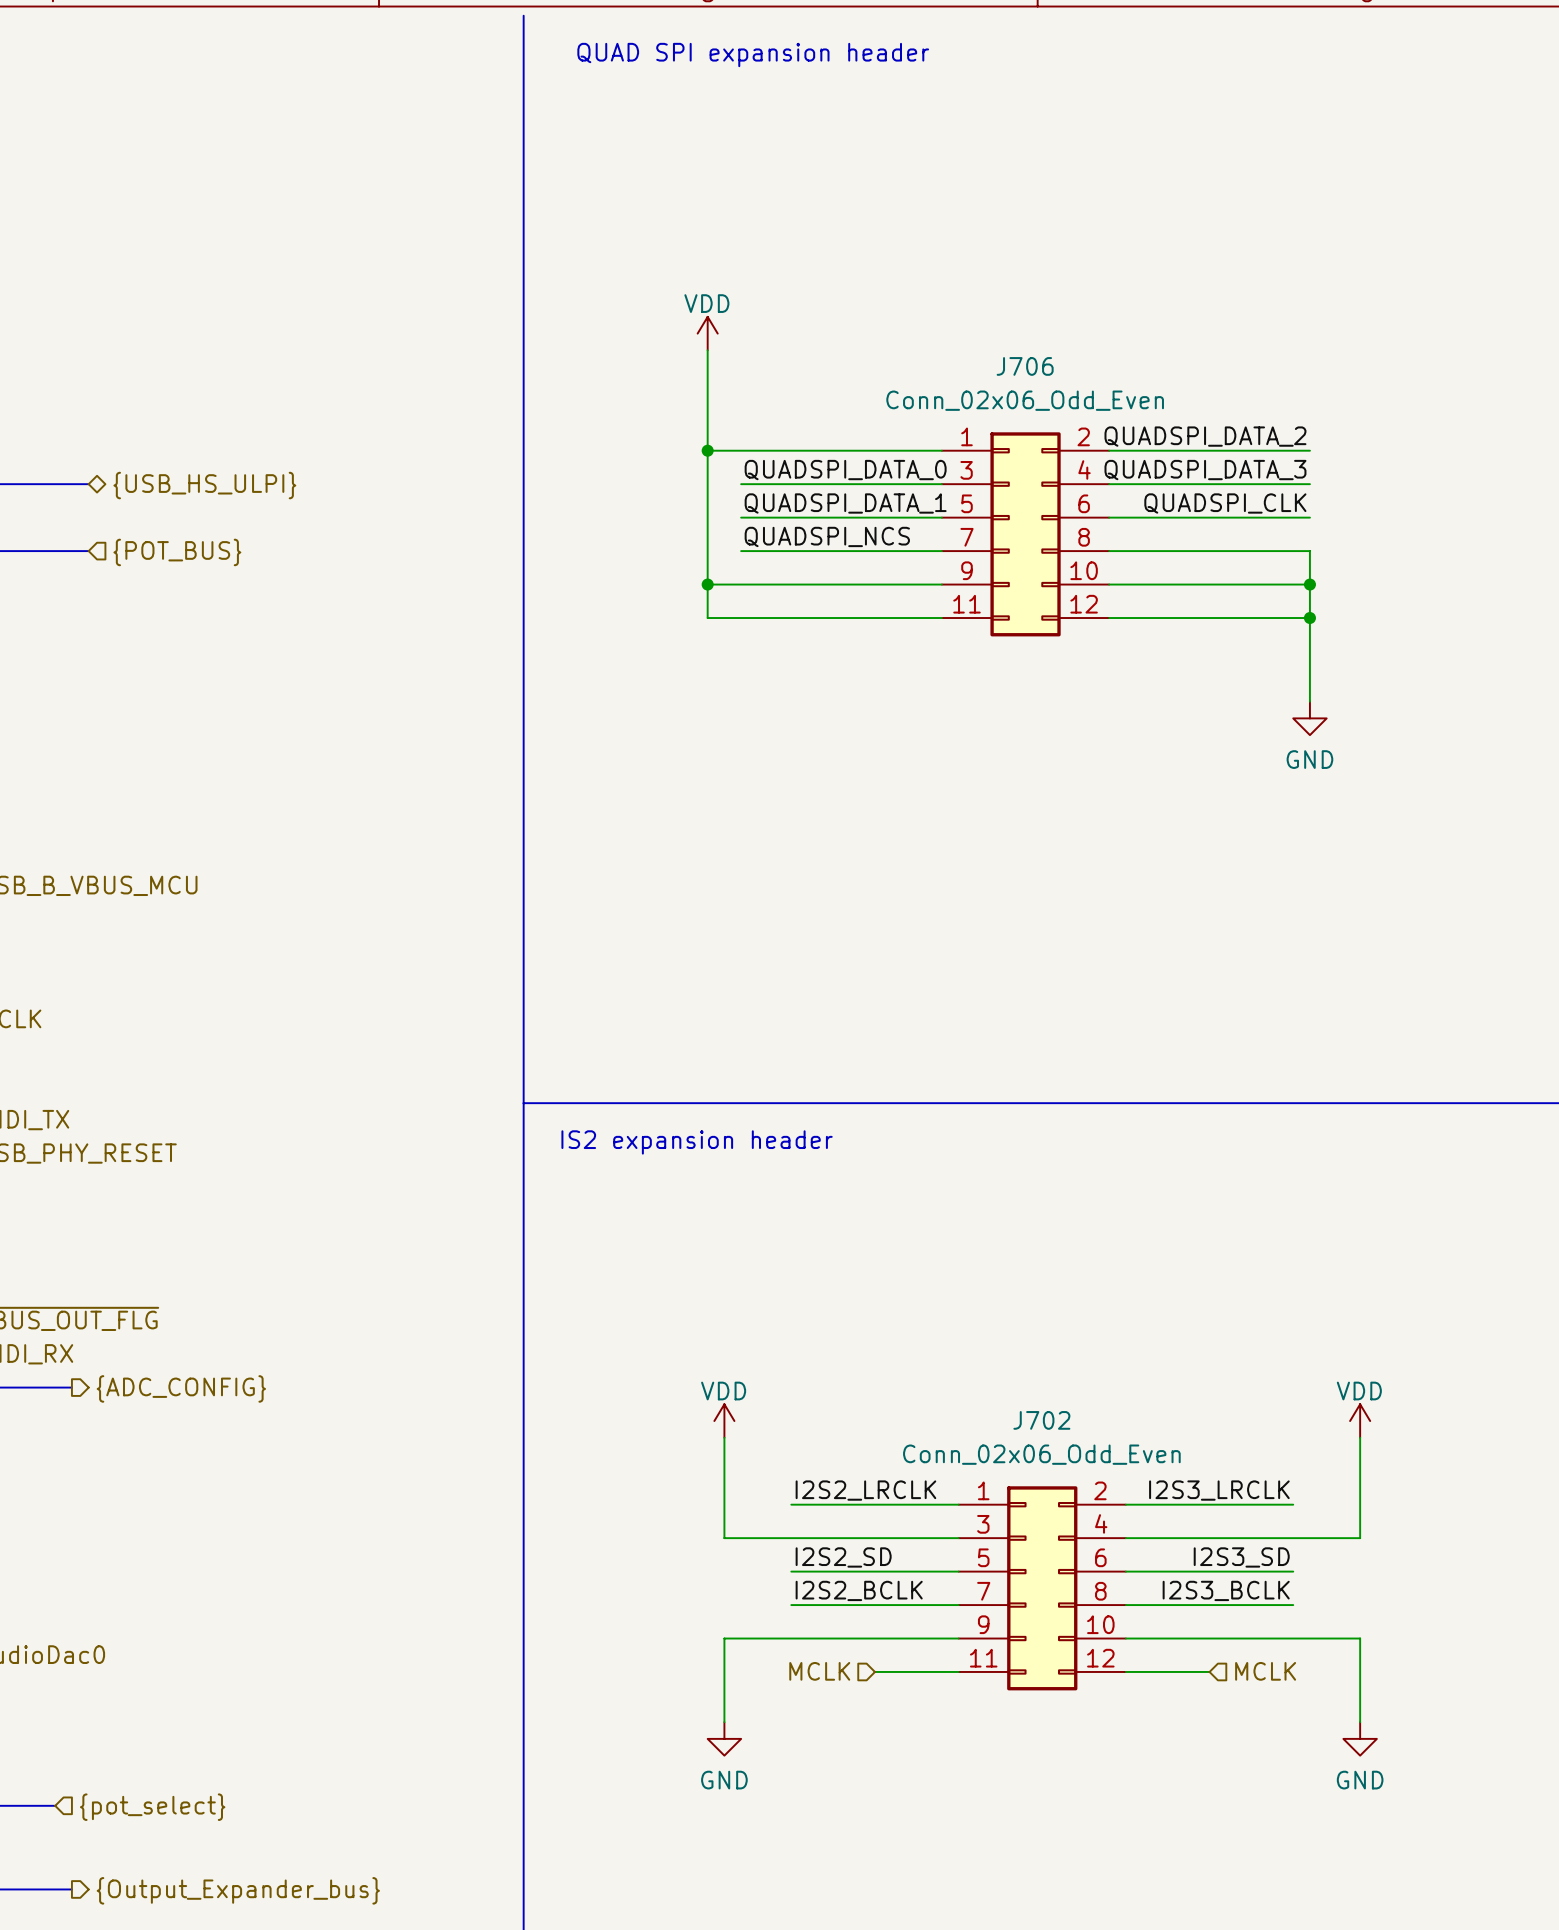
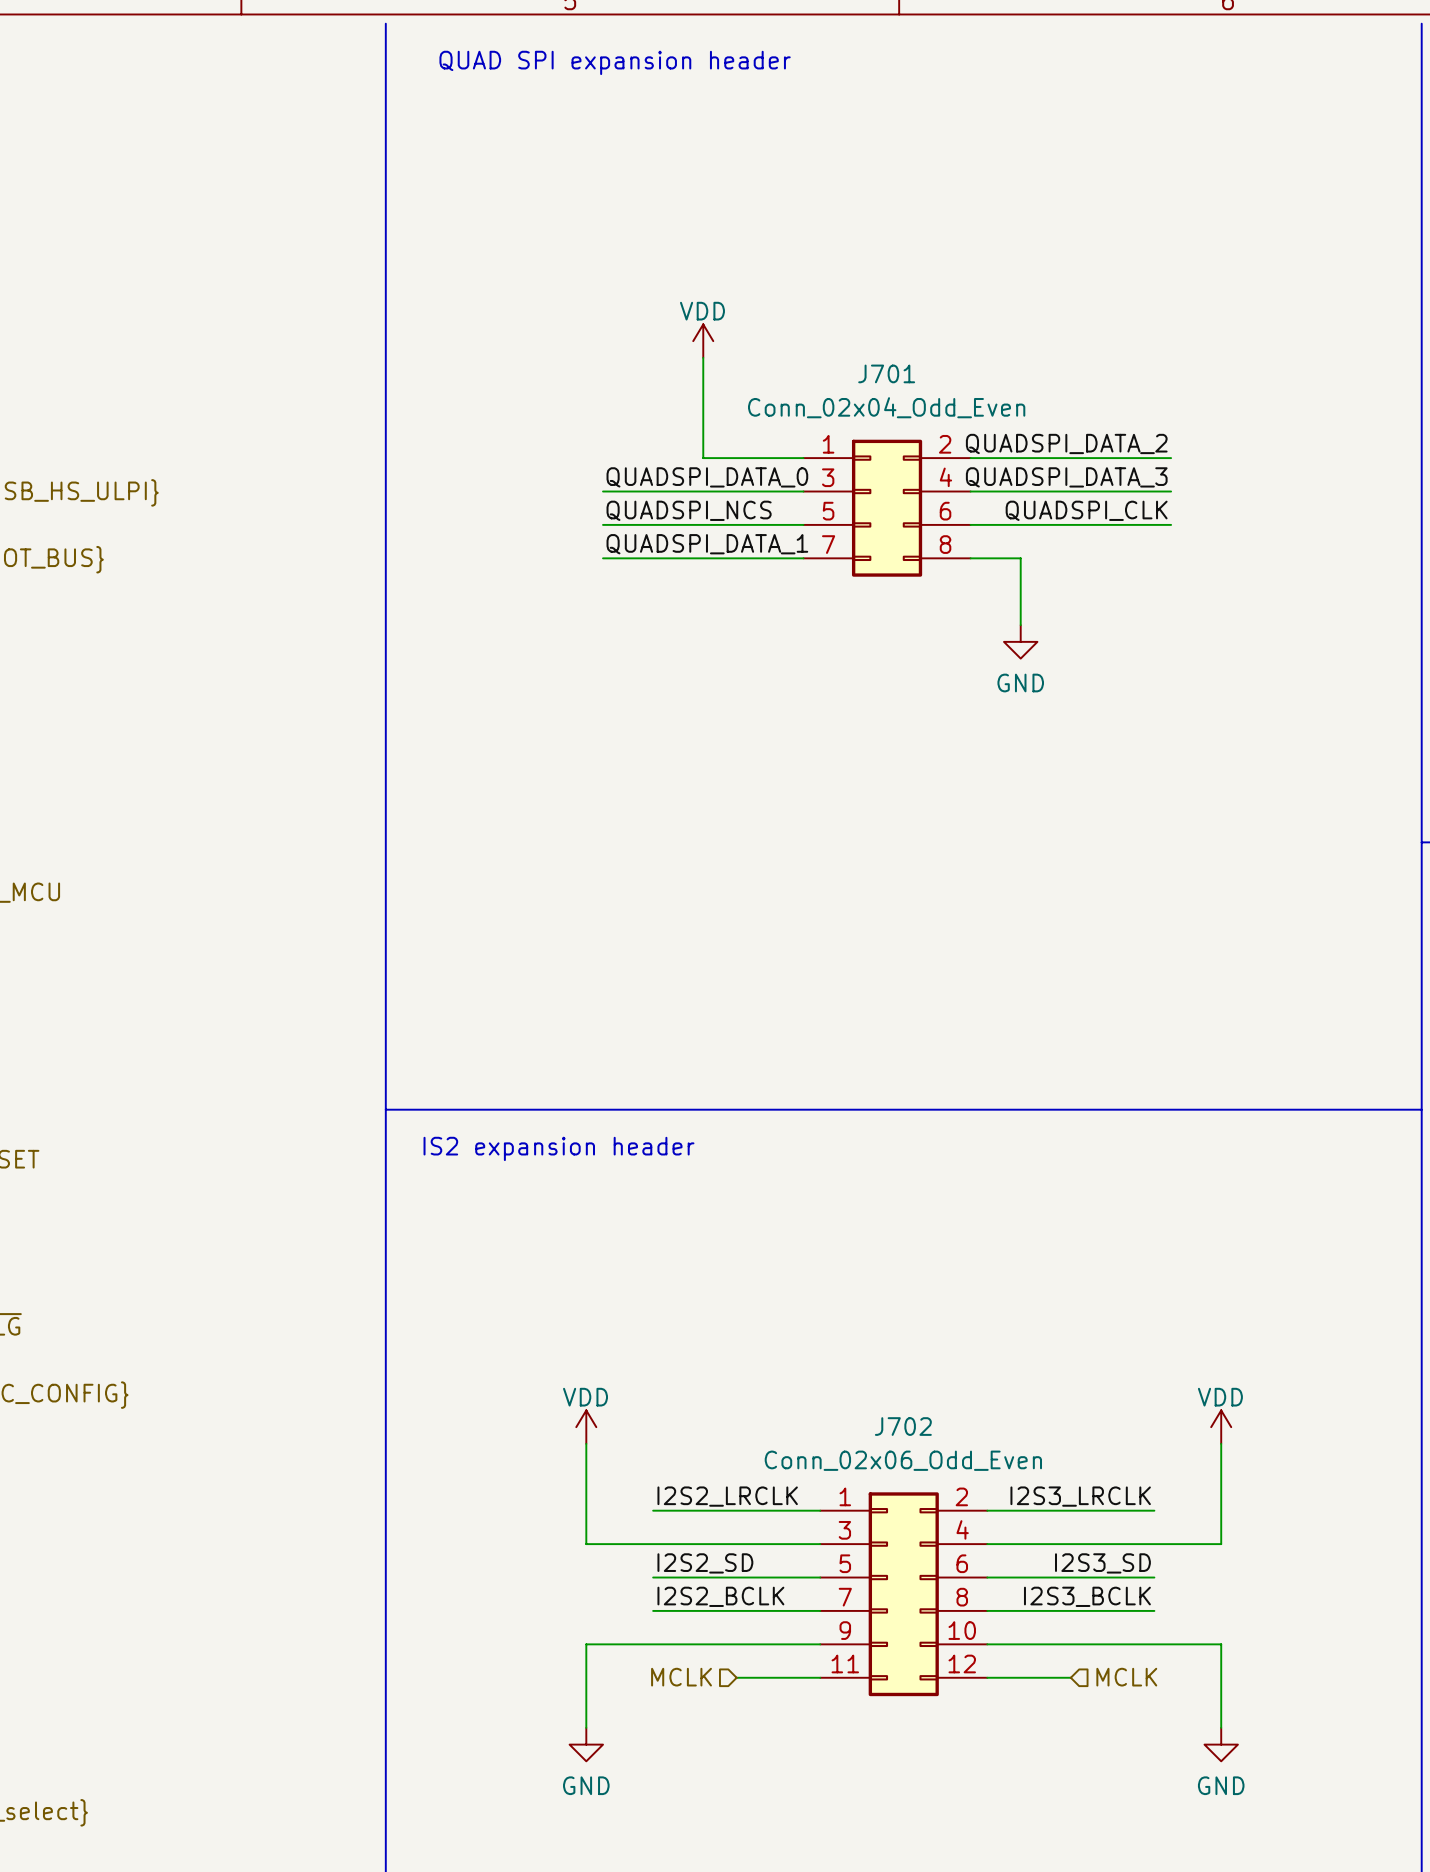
power symbol position: VDD (707, 333) -> VDD (703, 341)
wire: (707, 350) (707, 618) (941, 618) -> none
wire: (707, 450) (841, 450) -> (703, 357) (703, 458)
junction: (707, 450) -> none
J701: none -> Conn_02x04_Odd_Even (887, 508)
label: QUADSPI_DATA_1 (845, 503) -> QUADSPI_NCS (689, 510)
J706: Conn_02x06_Odd_Even (1025, 534) -> none
label: QUADSPI_NCS (827, 536) -> QUADSPI_DATA_1 (707, 544)
wire: (1159, 551) (1309, 551) (1309, 701) -> (1020, 558) (1020, 625)
wire: (707, 584) (941, 584) -> none
junction: (707, 584) -> none
wire: (1109, 584) (1309, 584) -> none
junction: (1309, 584) -> none
wire: (1109, 618) (1309, 618) -> none
junction: (1309, 618) -> none
power symbol position: GND (1309, 718) -> GND (1020, 641)

